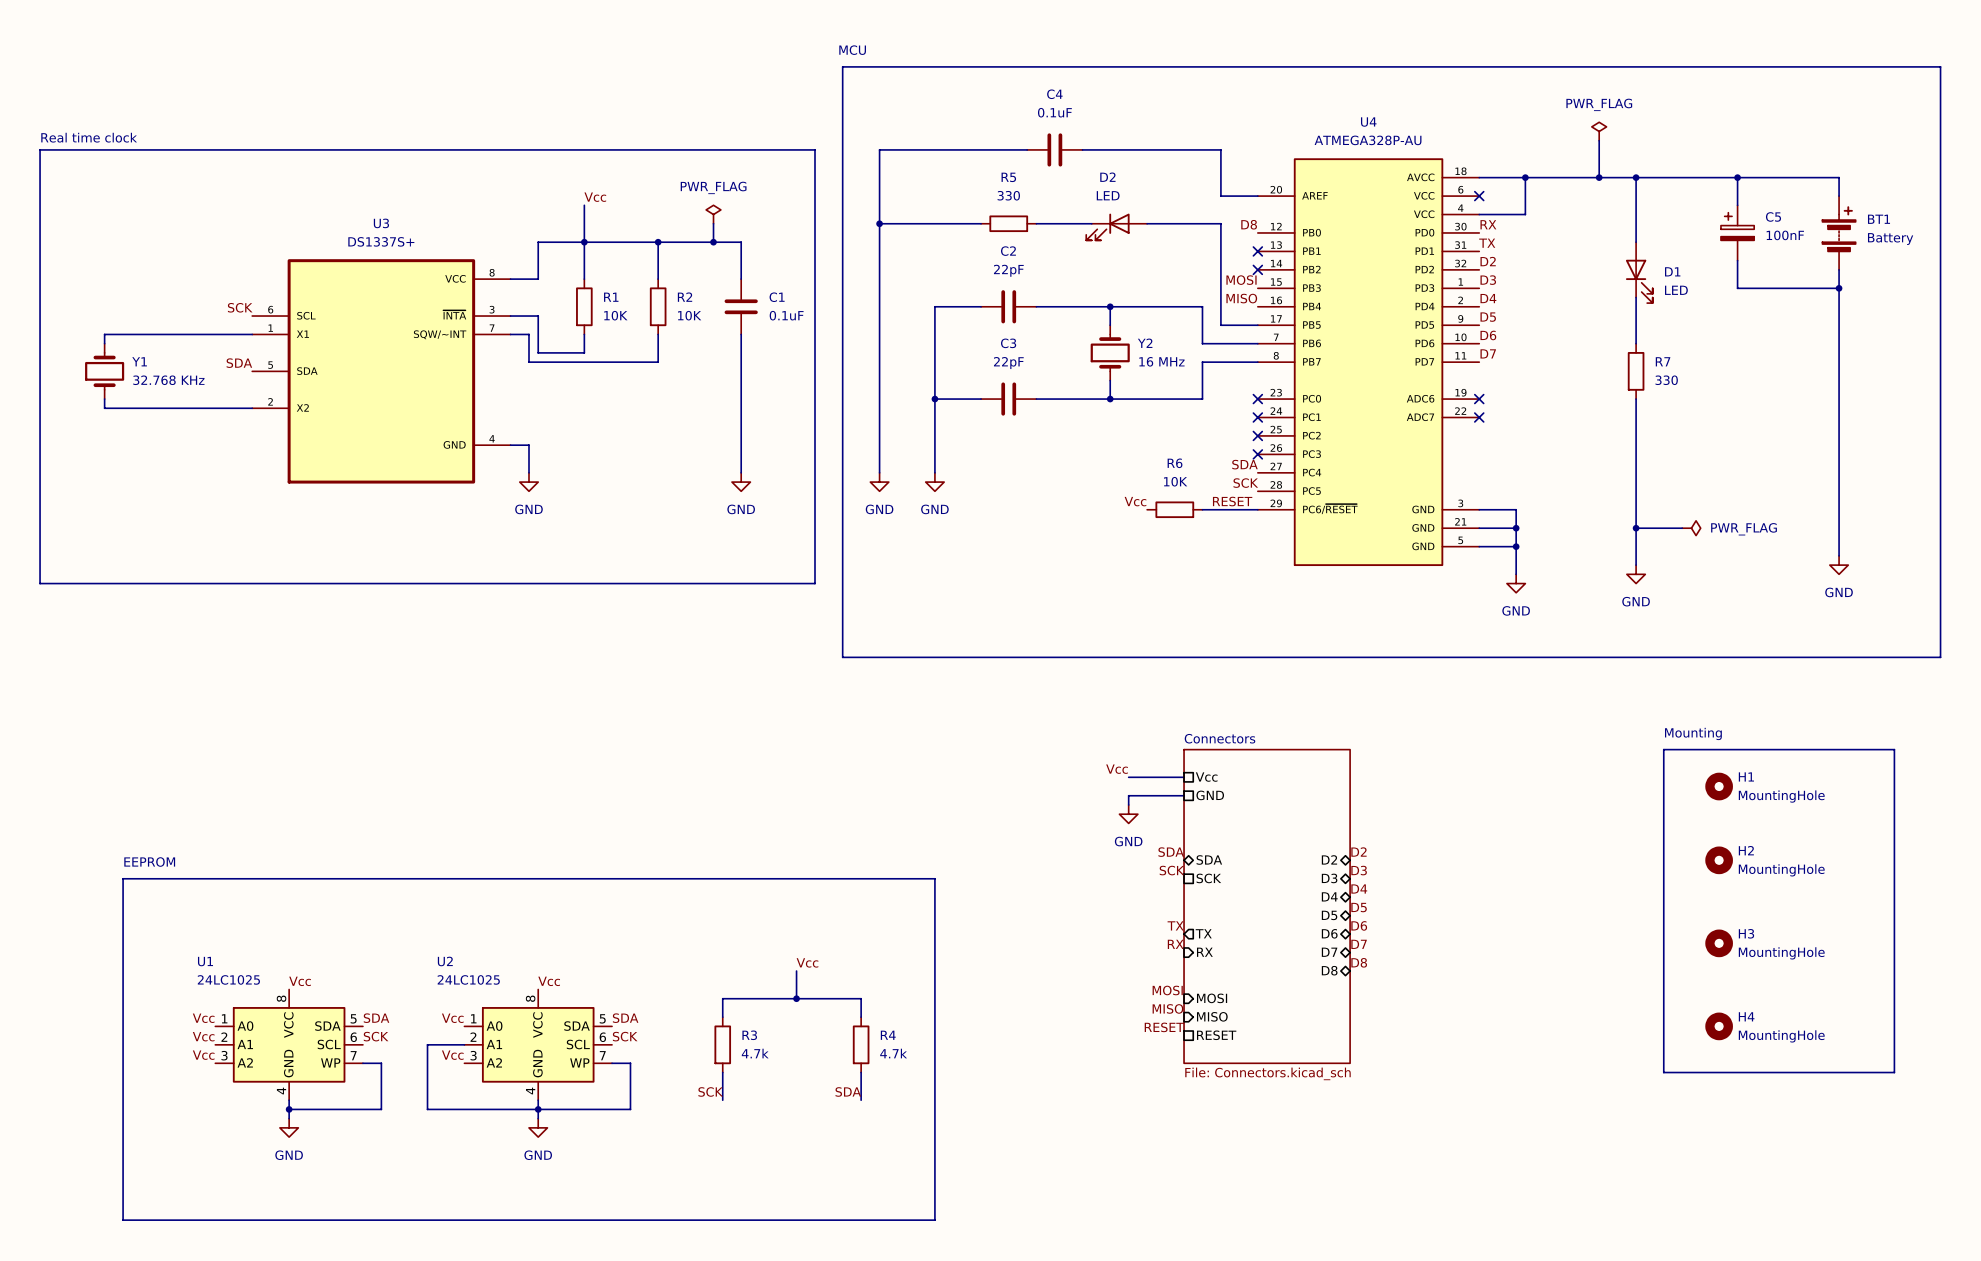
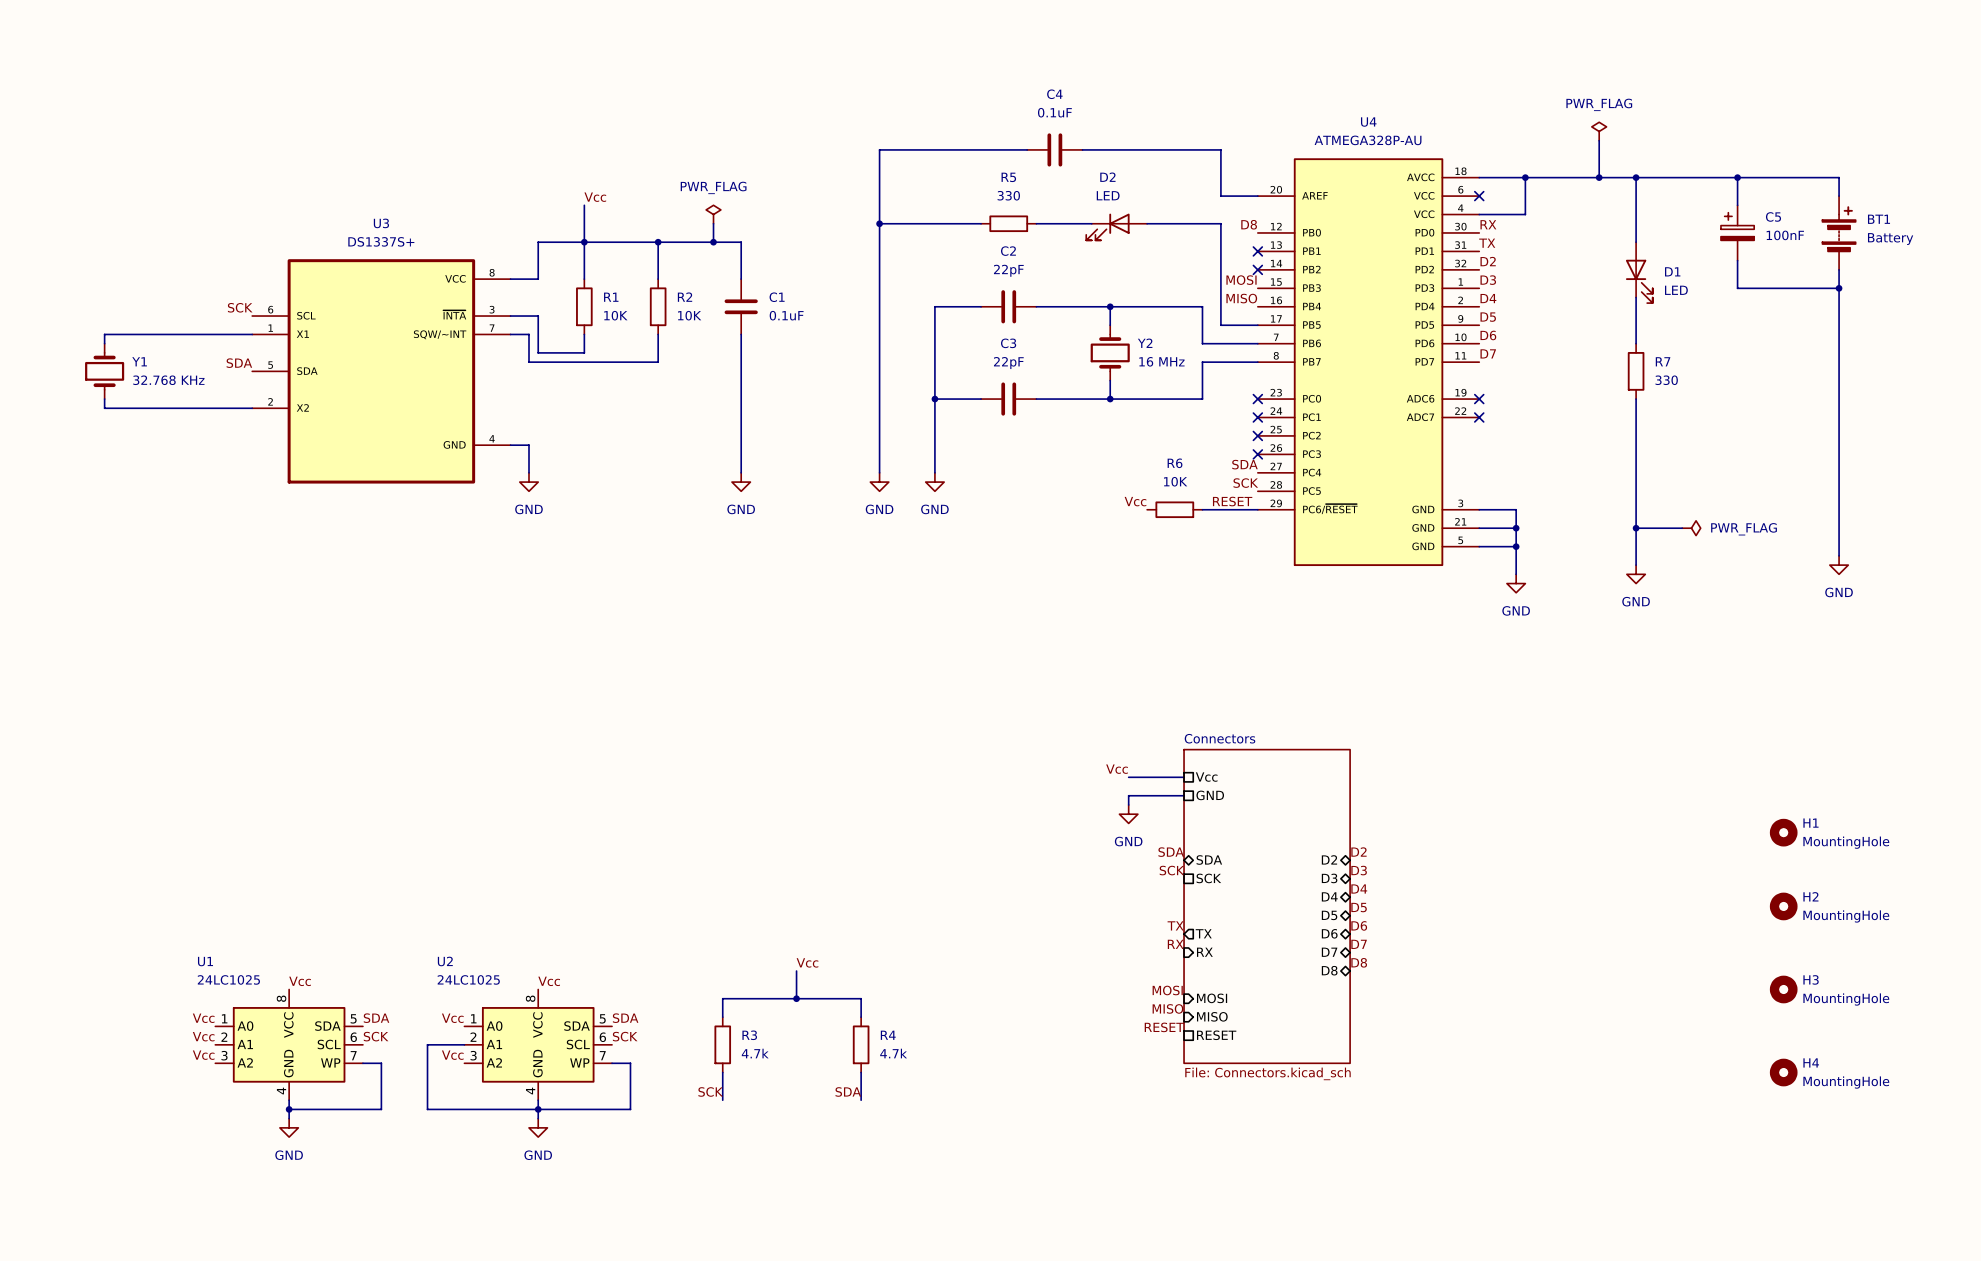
text: MCU (852, 50) -> none
line: (842, 66) (1940, 66) (1940, 657) (842, 657) (842, 66) -> none
text: Real time clock (89, 137) -> none
line: (40, 149) (40, 583) (814, 583) (814, 149) (40, 149) -> none
text: Mounting (1693, 733) -> none
line: (1663, 749) (1894, 749) (1894, 1072) (1663, 1072) (1663, 749) -> none
H1 position: (1719, 786) -> (1783, 832)
H2 position: (1719, 860) -> (1783, 906)
text: EEPROM (149, 862) -> none
line: (123, 878) (123, 1220) (934, 1220) (934, 878) (123, 878) -> none
H3 position: (1719, 943) -> (1783, 989)
H4 position: (1719, 1026) -> (1783, 1072)

